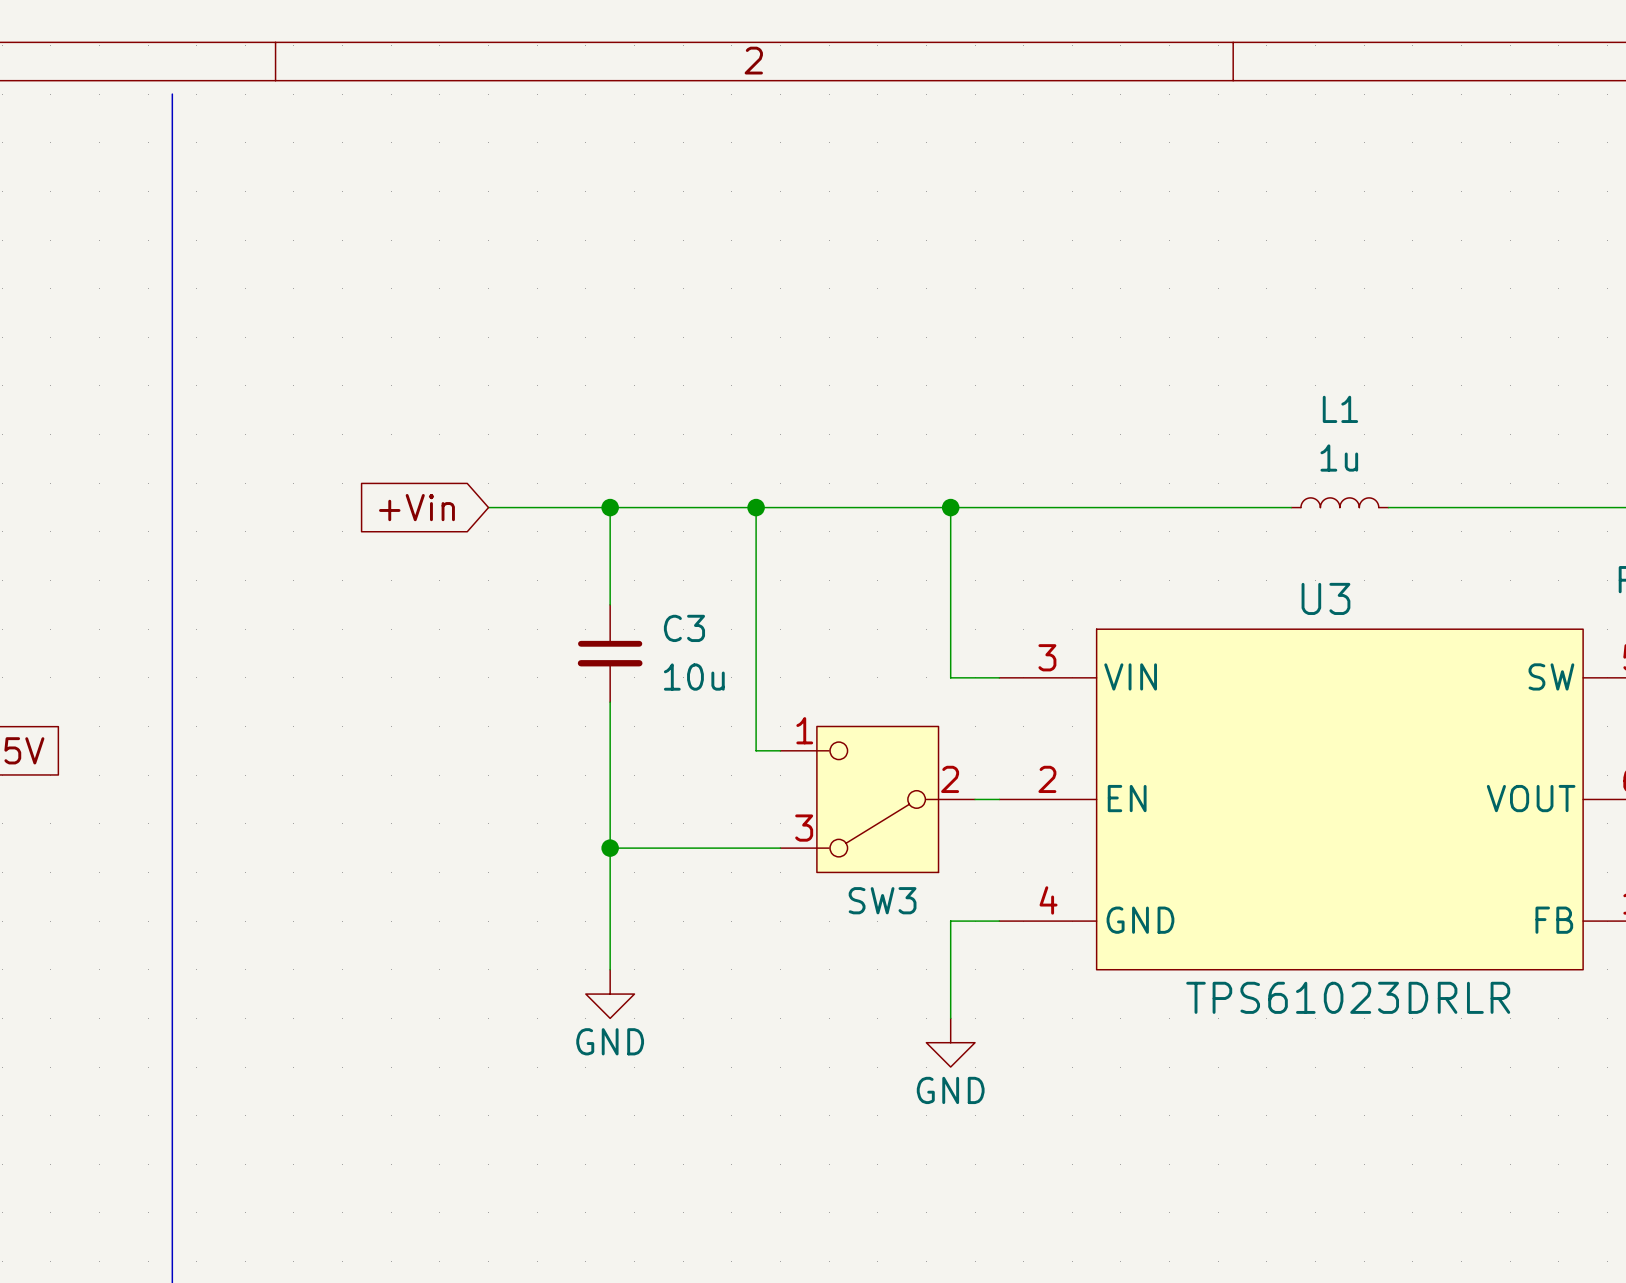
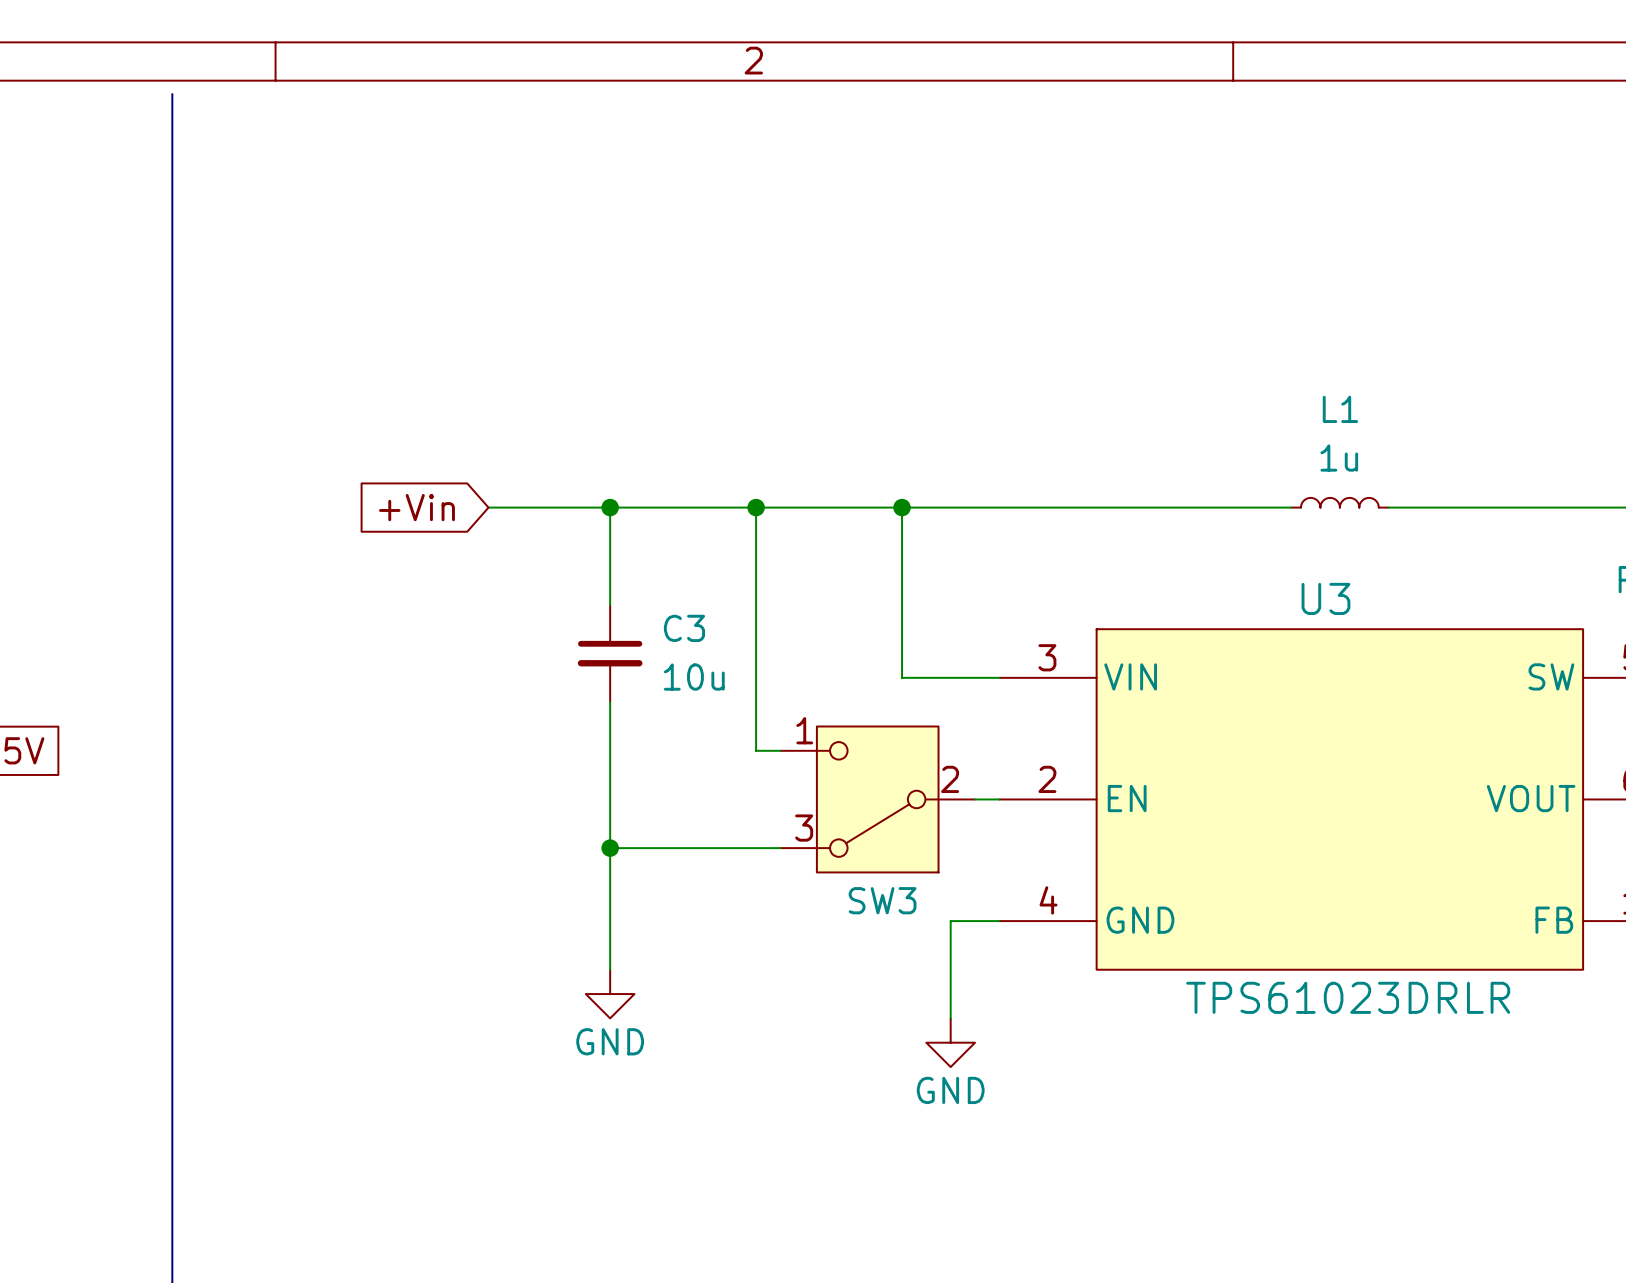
wire: (950, 507) (950, 677) -> (902, 507) (902, 677) (950, 677)
junction position: (950, 507) -> (902, 507)

